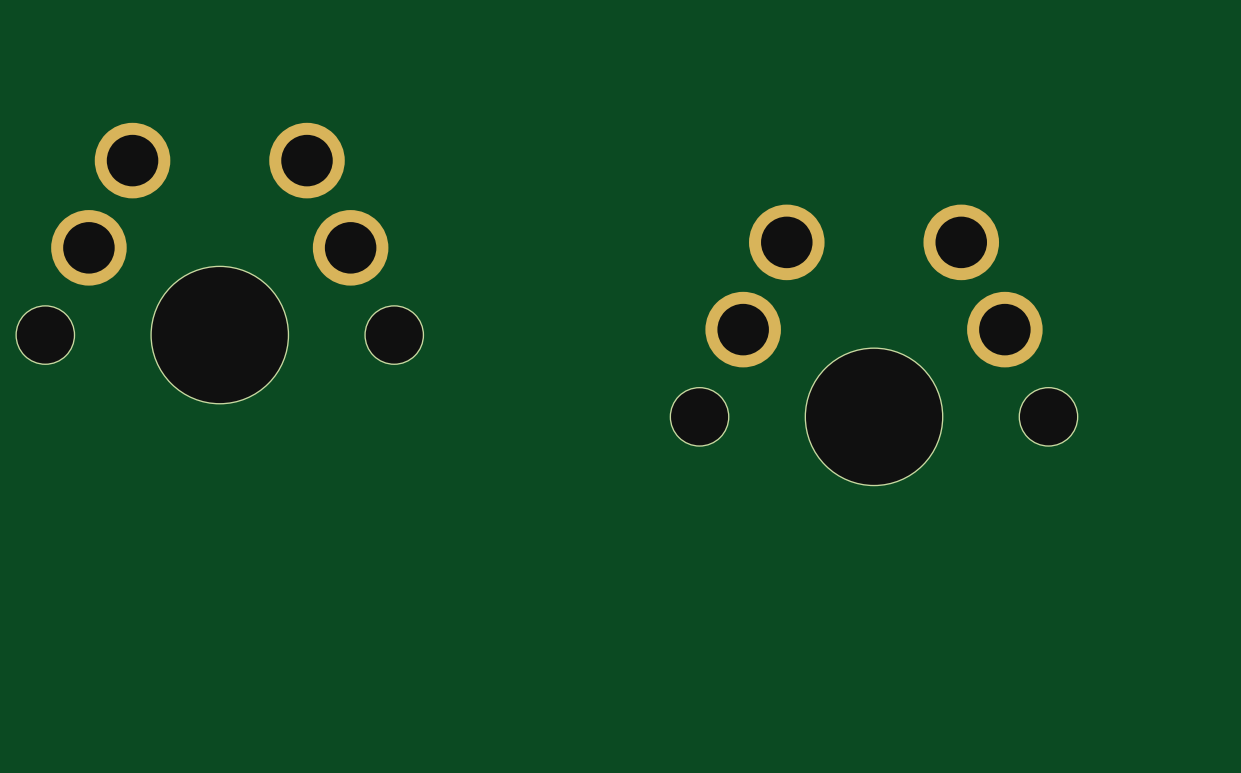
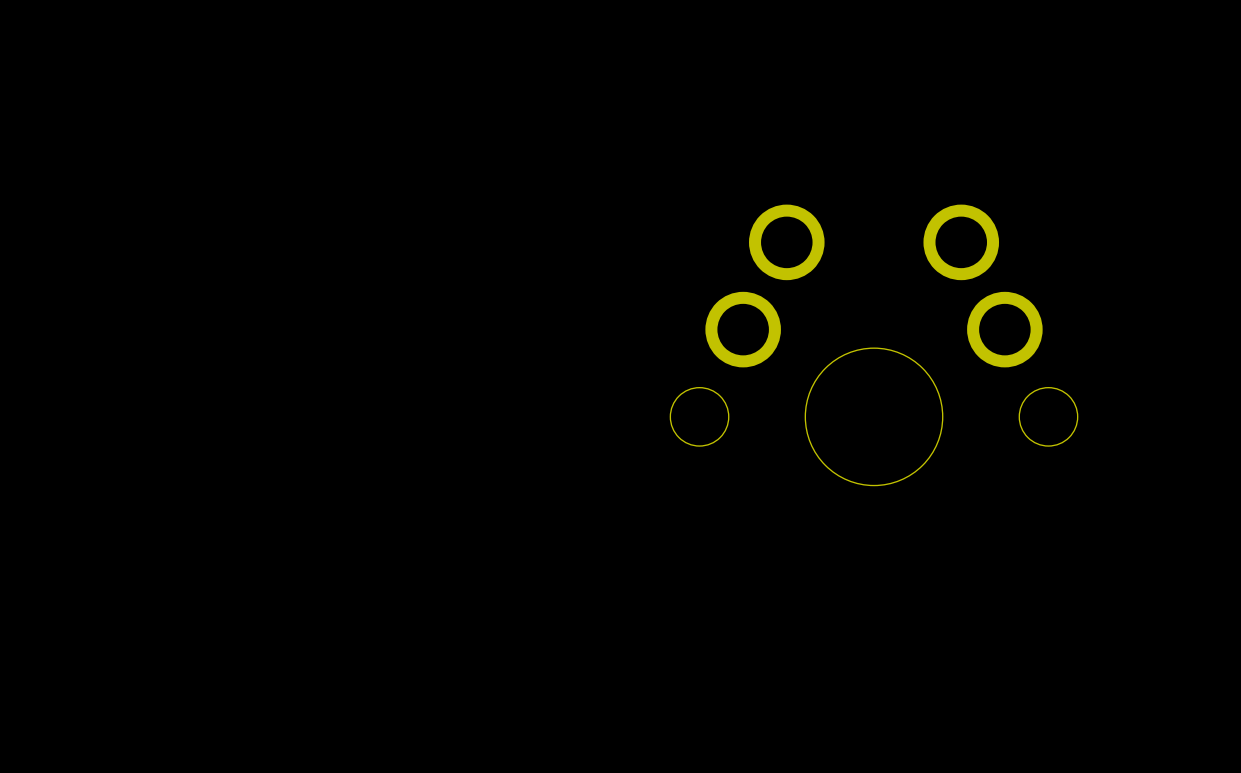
part: (219, 263) -> none

